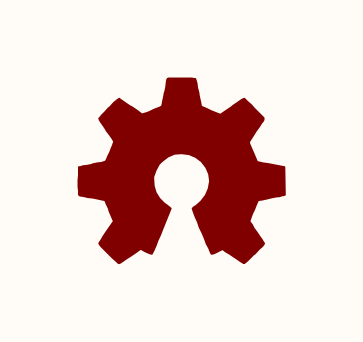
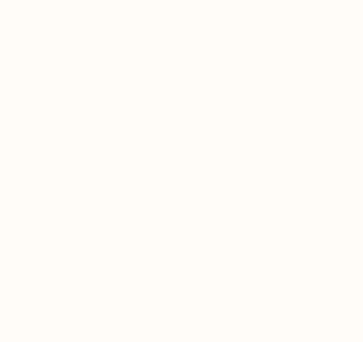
power symbol: (181, 170) -> none

